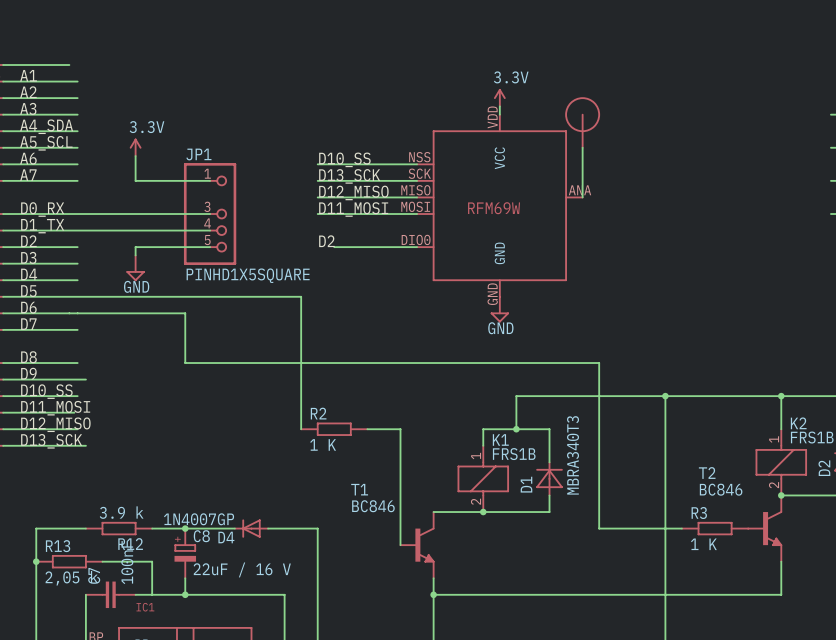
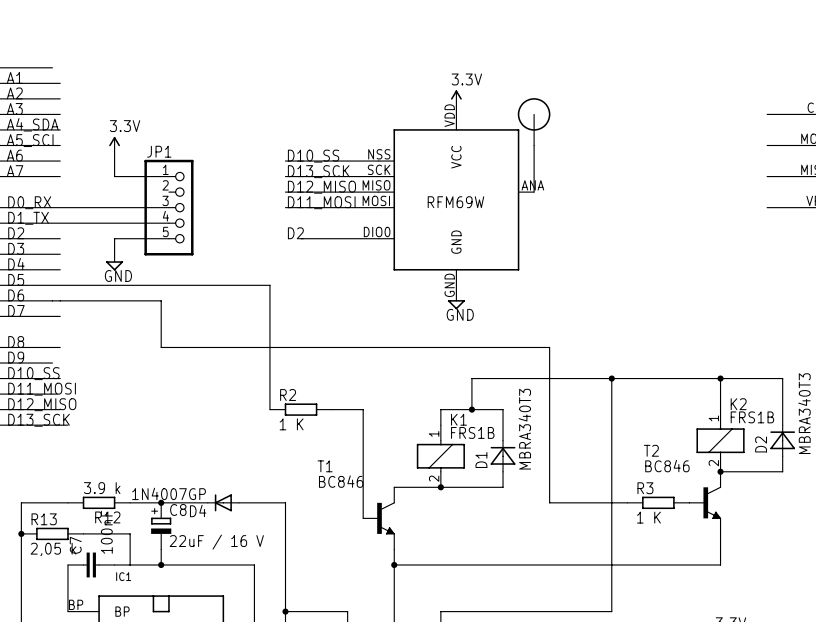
JP1 symbol: [183, 163, 237, 266] -> [144, 159, 194, 256]
JP1 value: PINHD1X5SQUARE (248, 275) -> none
wire: (69, 379) (85, 379) -> none

